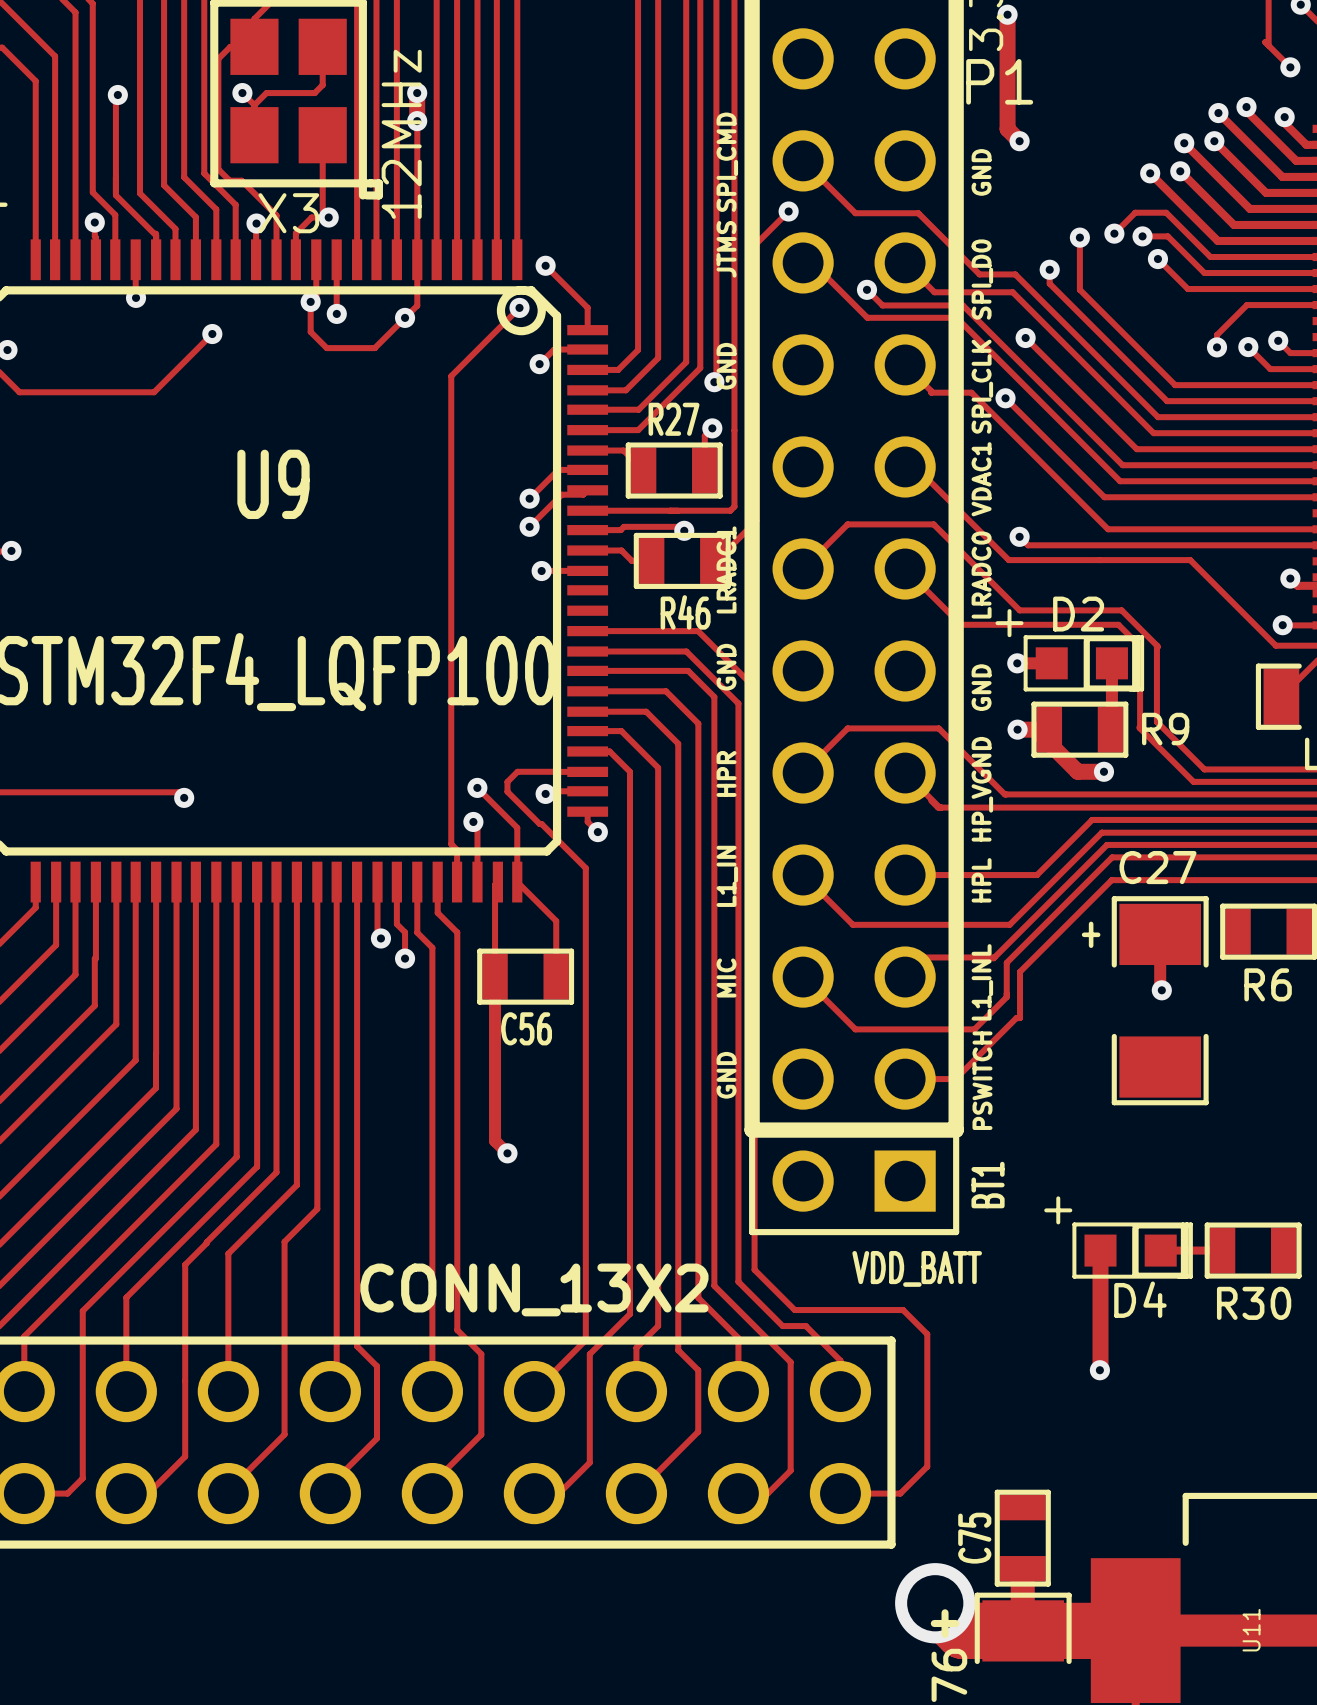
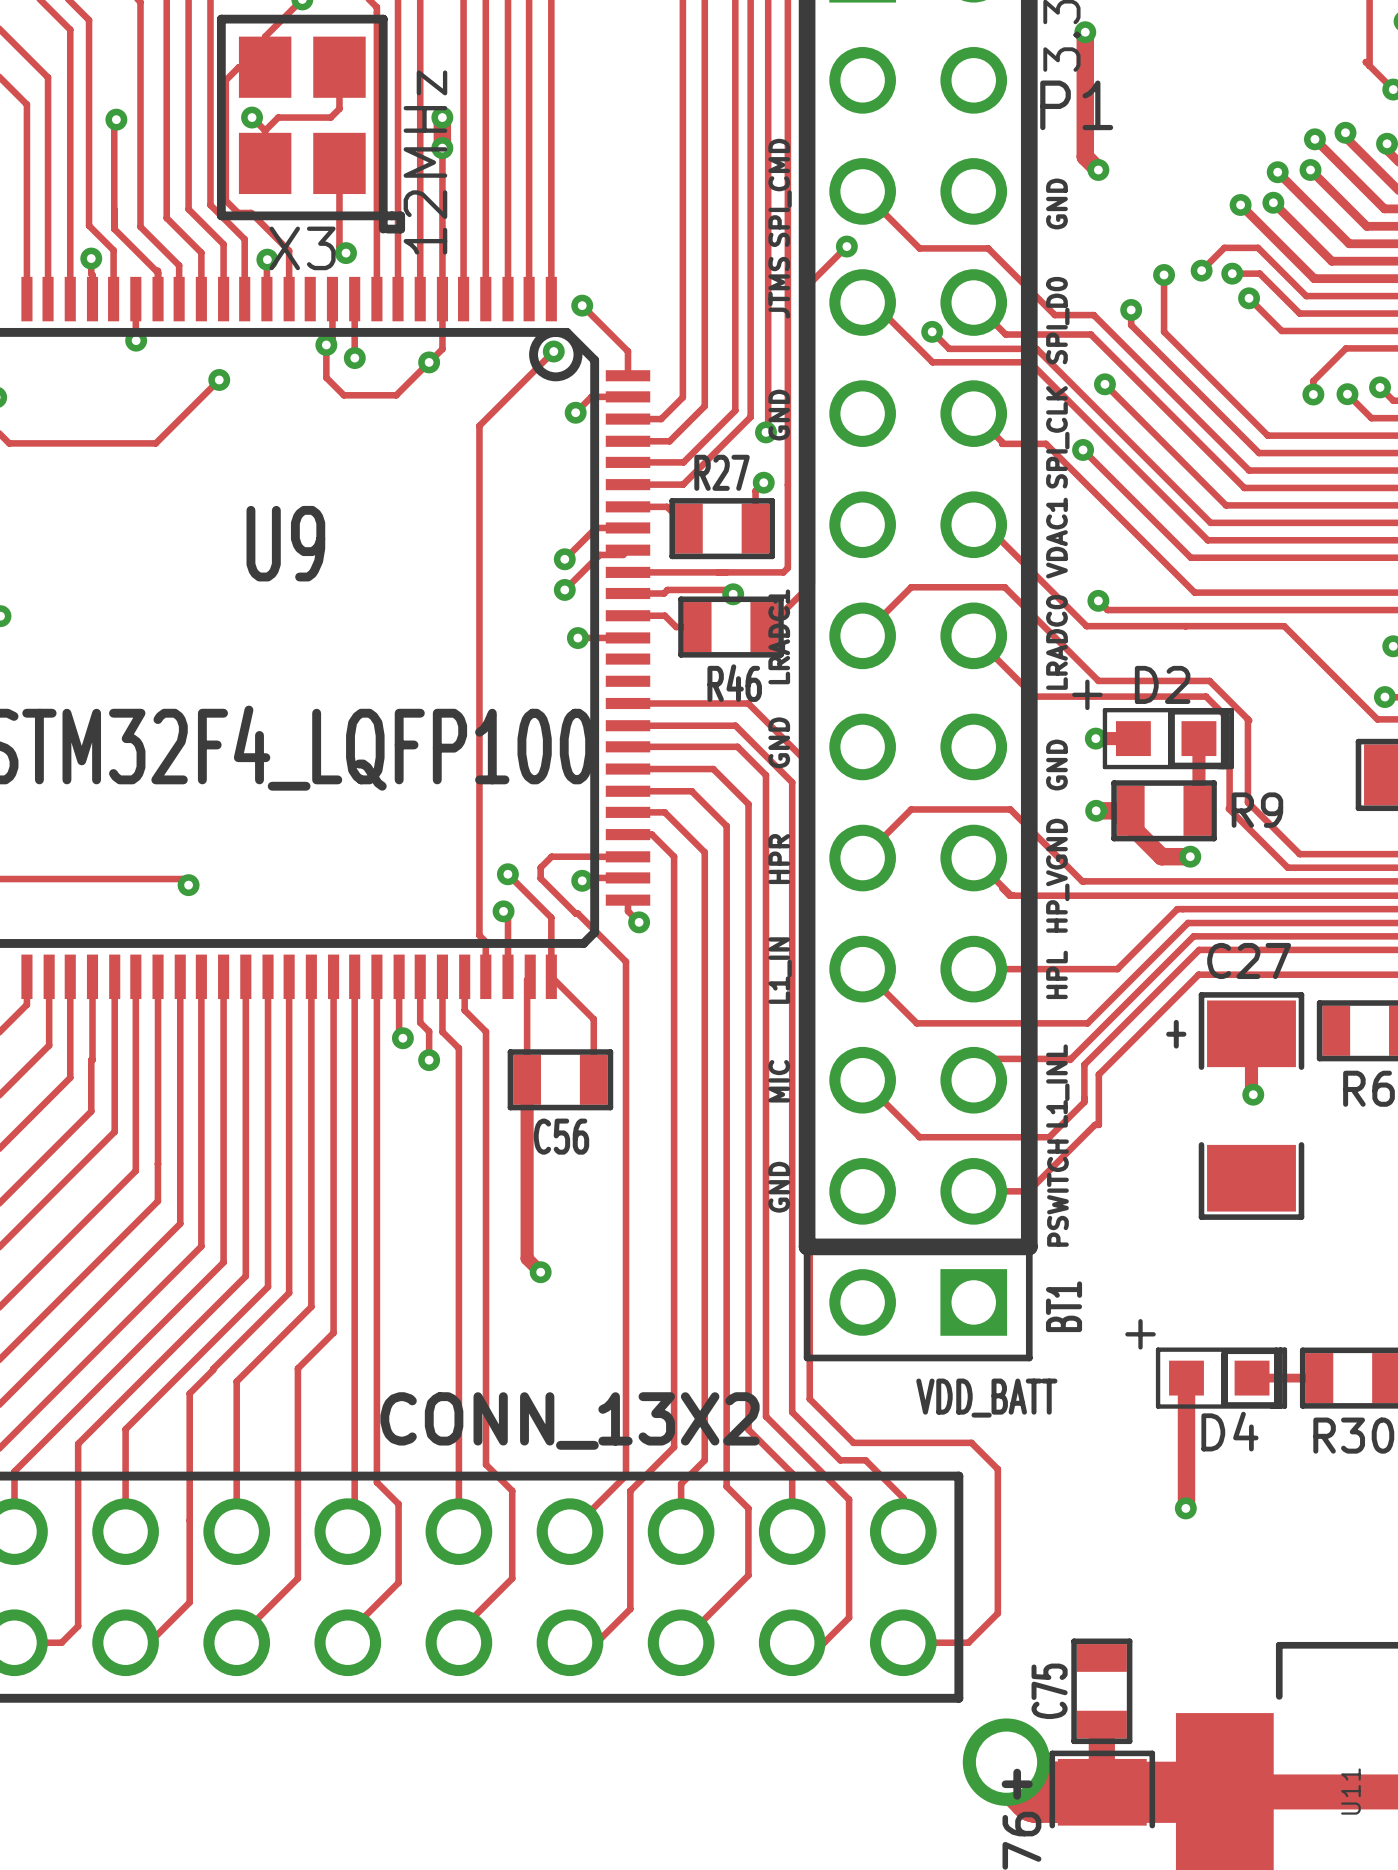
track: (328, 217) (311, 217) (295, 233) (295, 259) -> none

